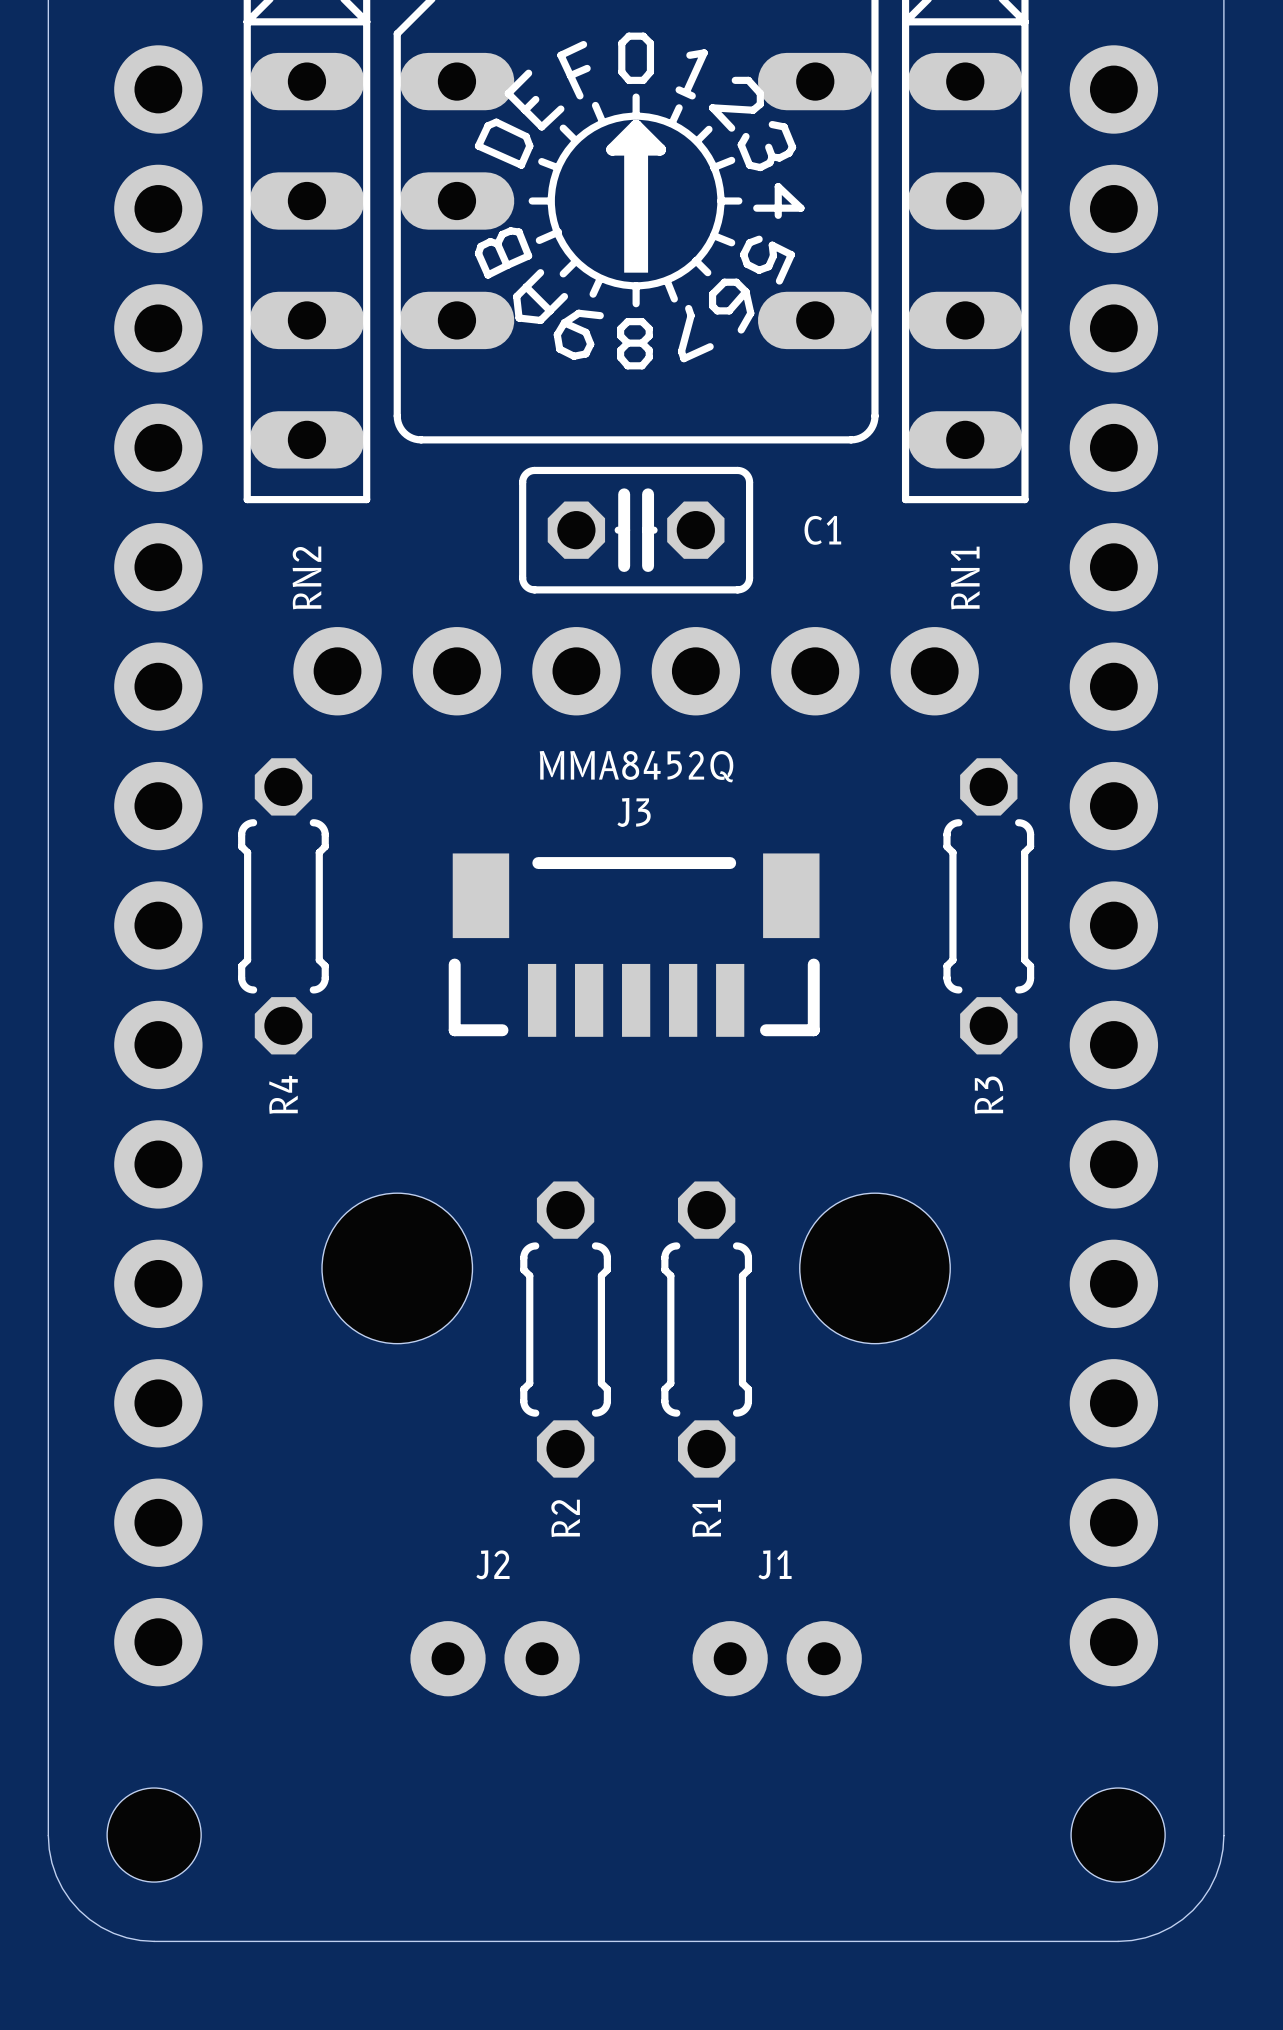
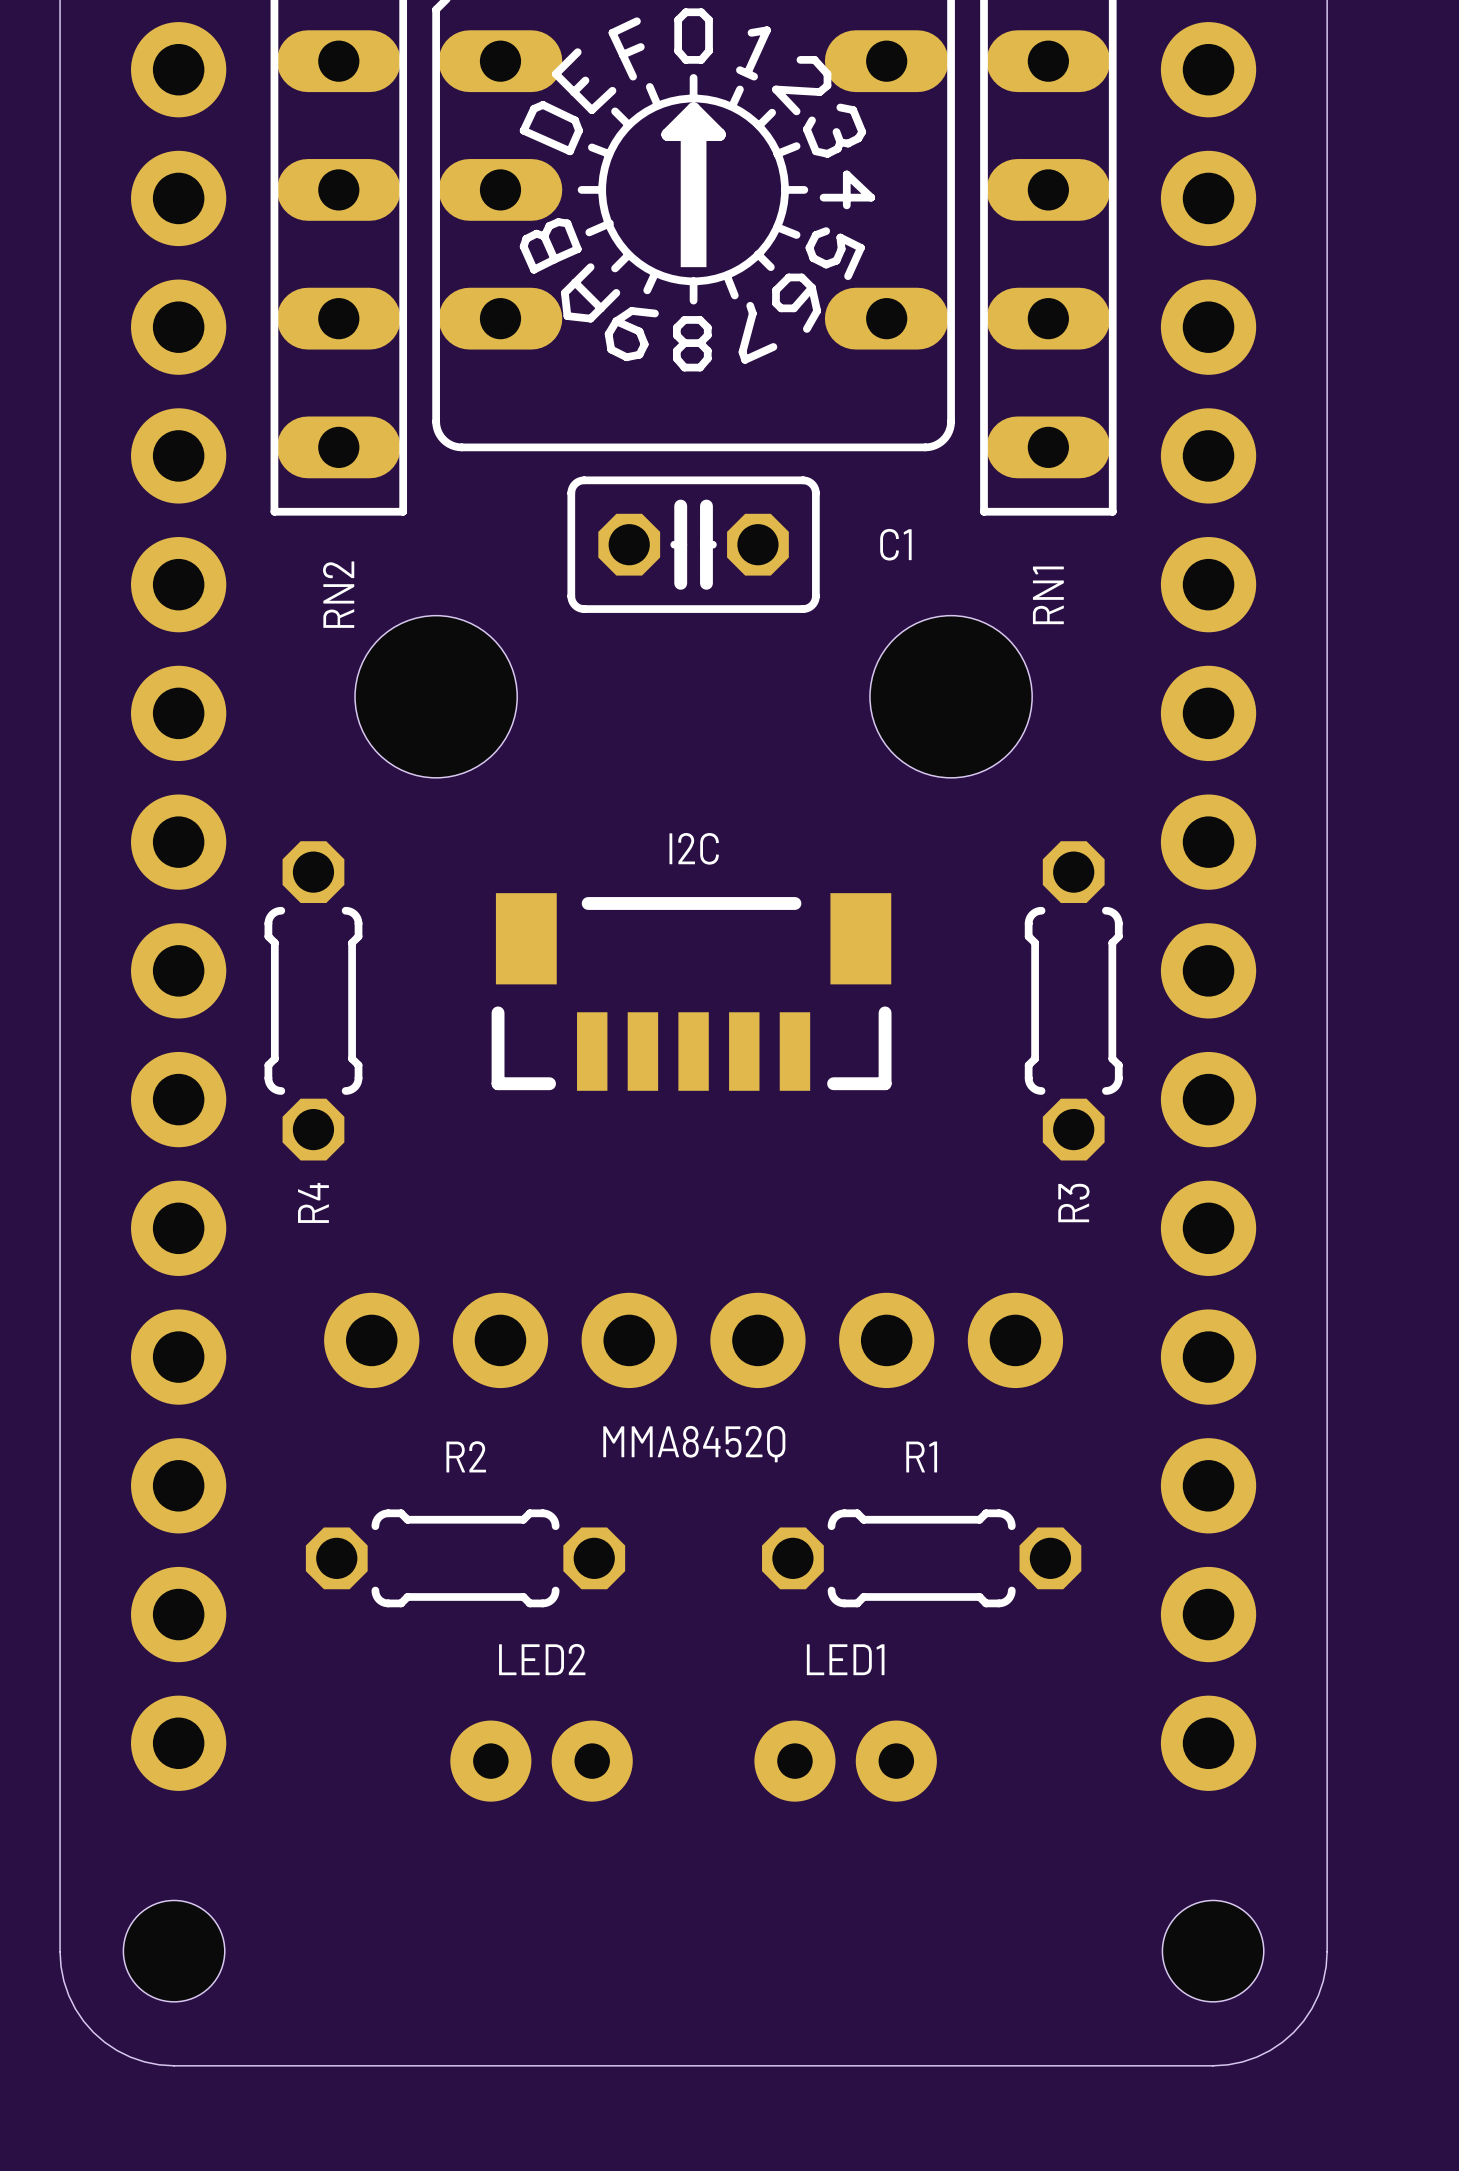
hole: none -> (436, 696)
MMA8452Q position: (636, 671) -> (693, 1340)
hole: none -> (951, 696)
J3 name: J3 (634, 812) -> I2C (694, 848)
R4 position: (283, 906) -> (313, 1000)
R3 position: (988, 906) -> (1073, 1000)
hole: (397, 1268) -> none
hole: (874, 1268) -> none
R2 rotation: 0° (565, 1329) -> 90° clockwise (465, 1558)
R2 position: (565, 1329) -> (465, 1558)
R1 rotation: 0° (706, 1329) -> 90° clockwise (921, 1558)
R1 position: (706, 1329) -> (921, 1558)
R2 name position: R2 (565, 1518) -> R2 (466, 1456)
R1 name position: R1 (706, 1518) -> R1 (921, 1457)
J2 name: J2 (492, 1564) -> LED2 (542, 1659)
J1 name: J1 (775, 1564) -> LED1 (845, 1659)

